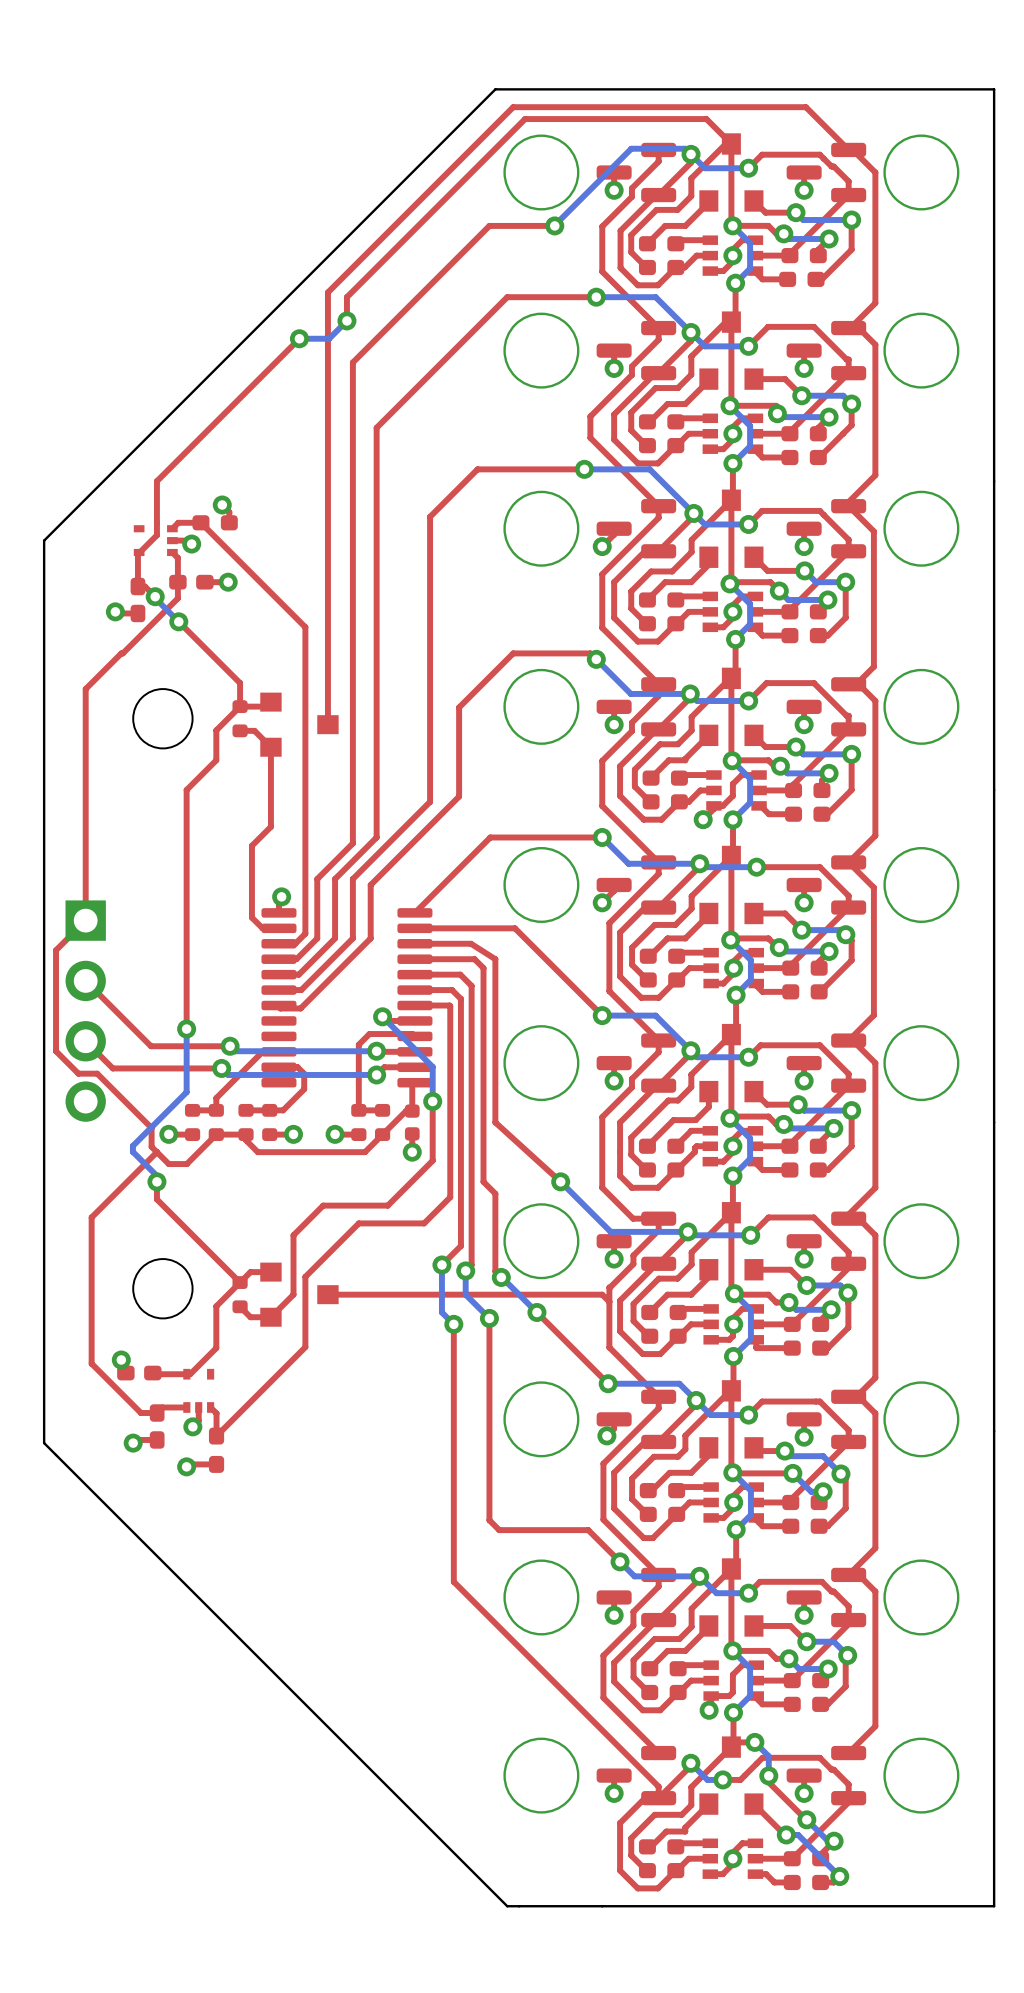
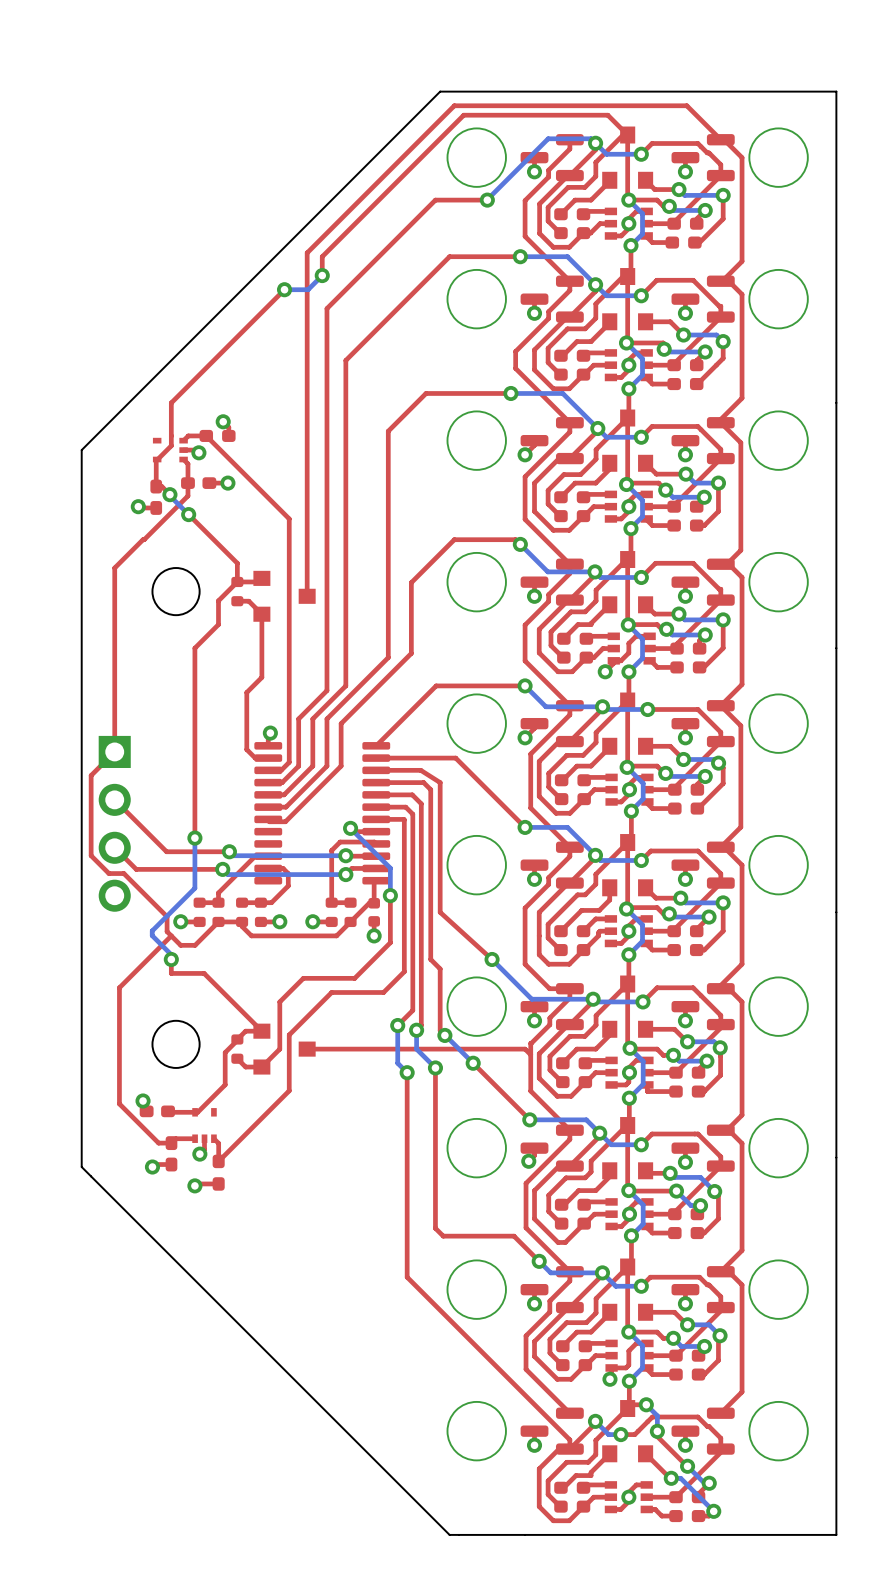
top track: (156, 1199) (240, 1282) (216, 1306) (216, 1348) -> (171, 973) (204, 973) (261, 1031)
top track: none -> (237, 1039) (225, 1052) (225, 1084) (218, 1091)

